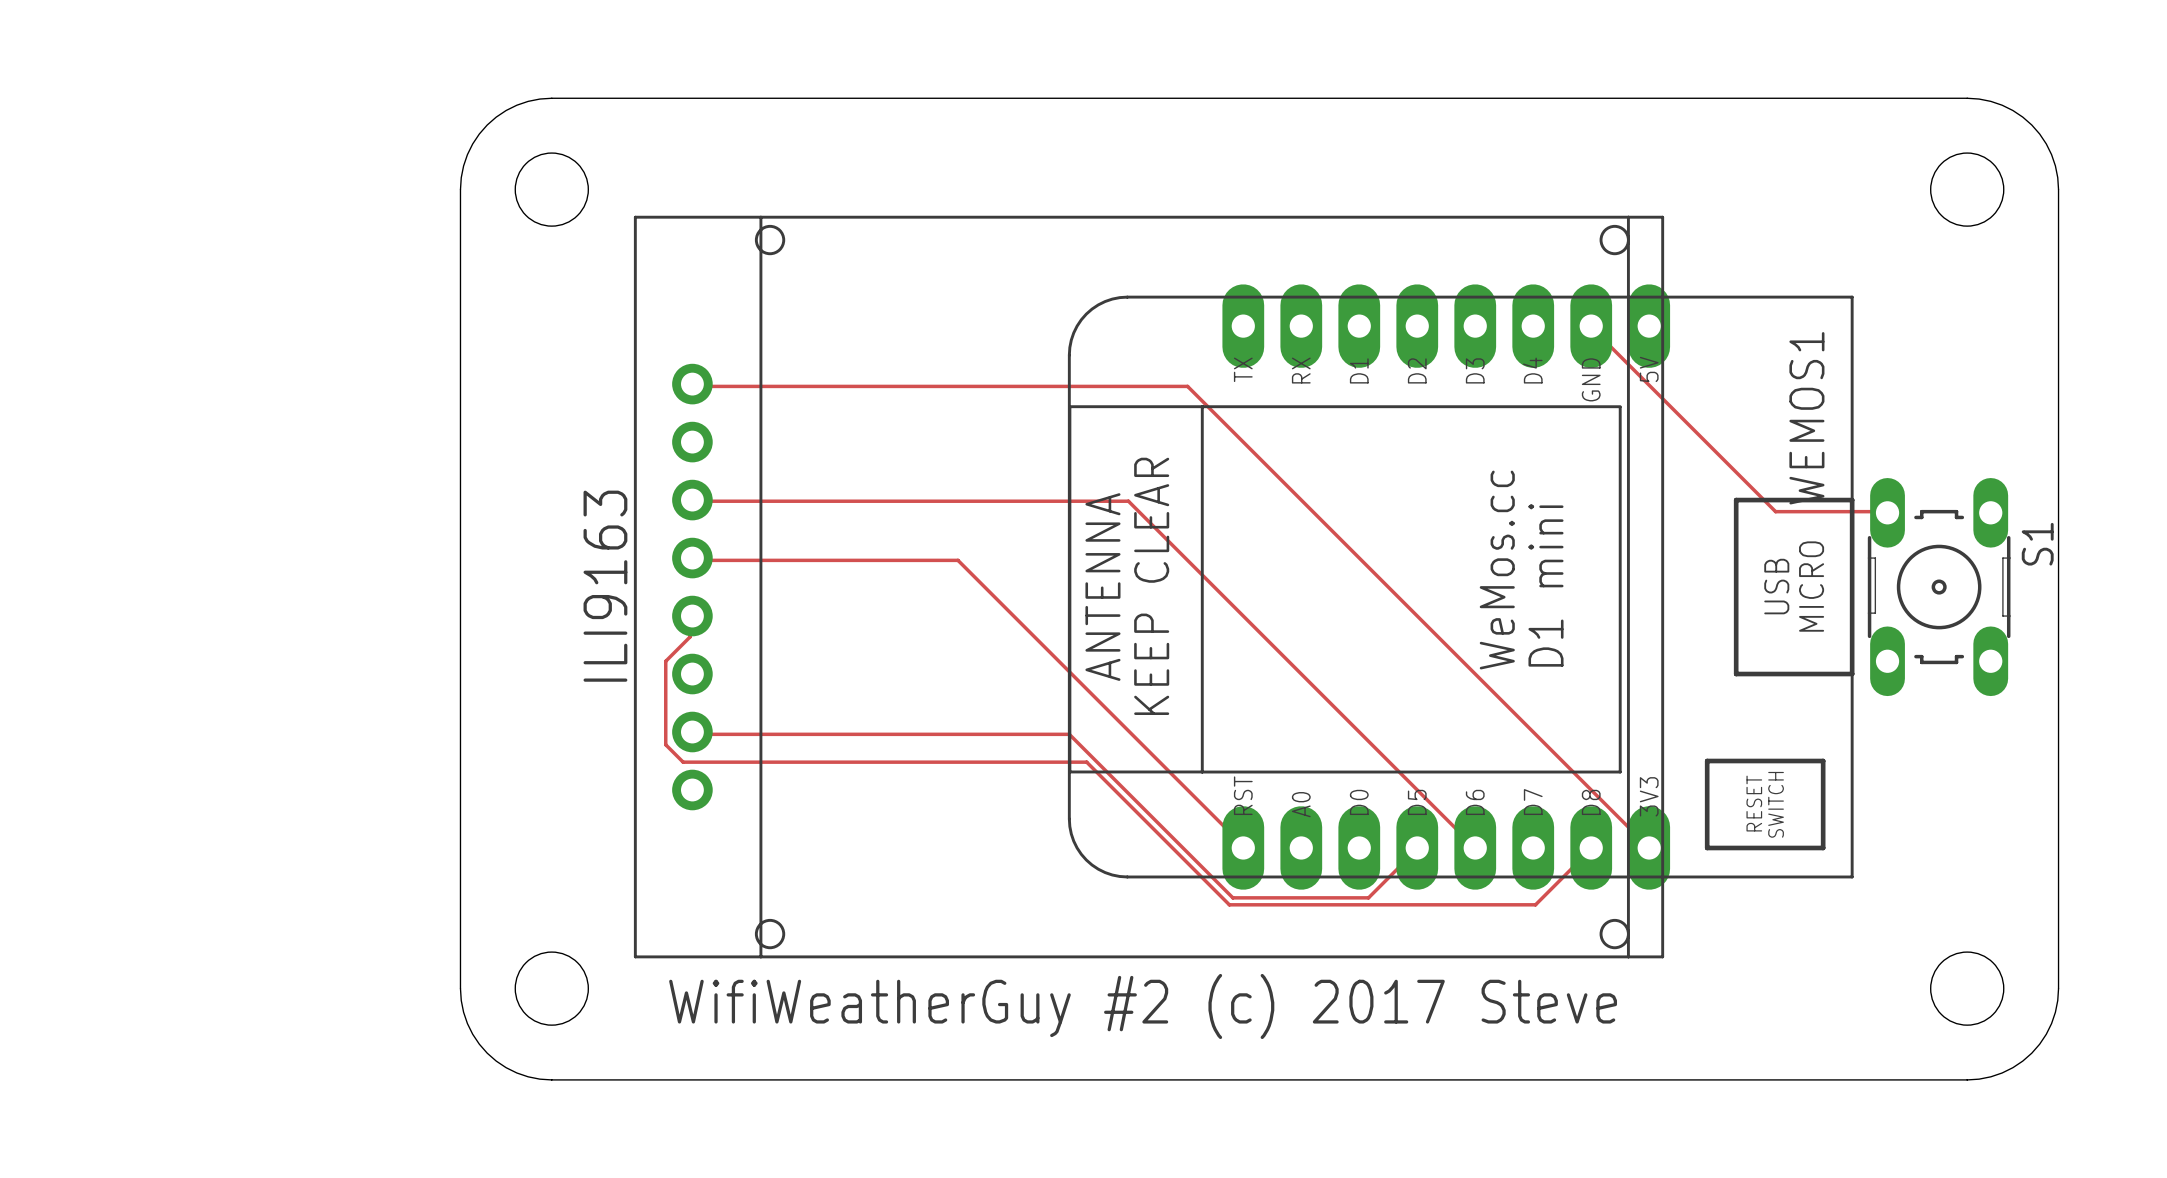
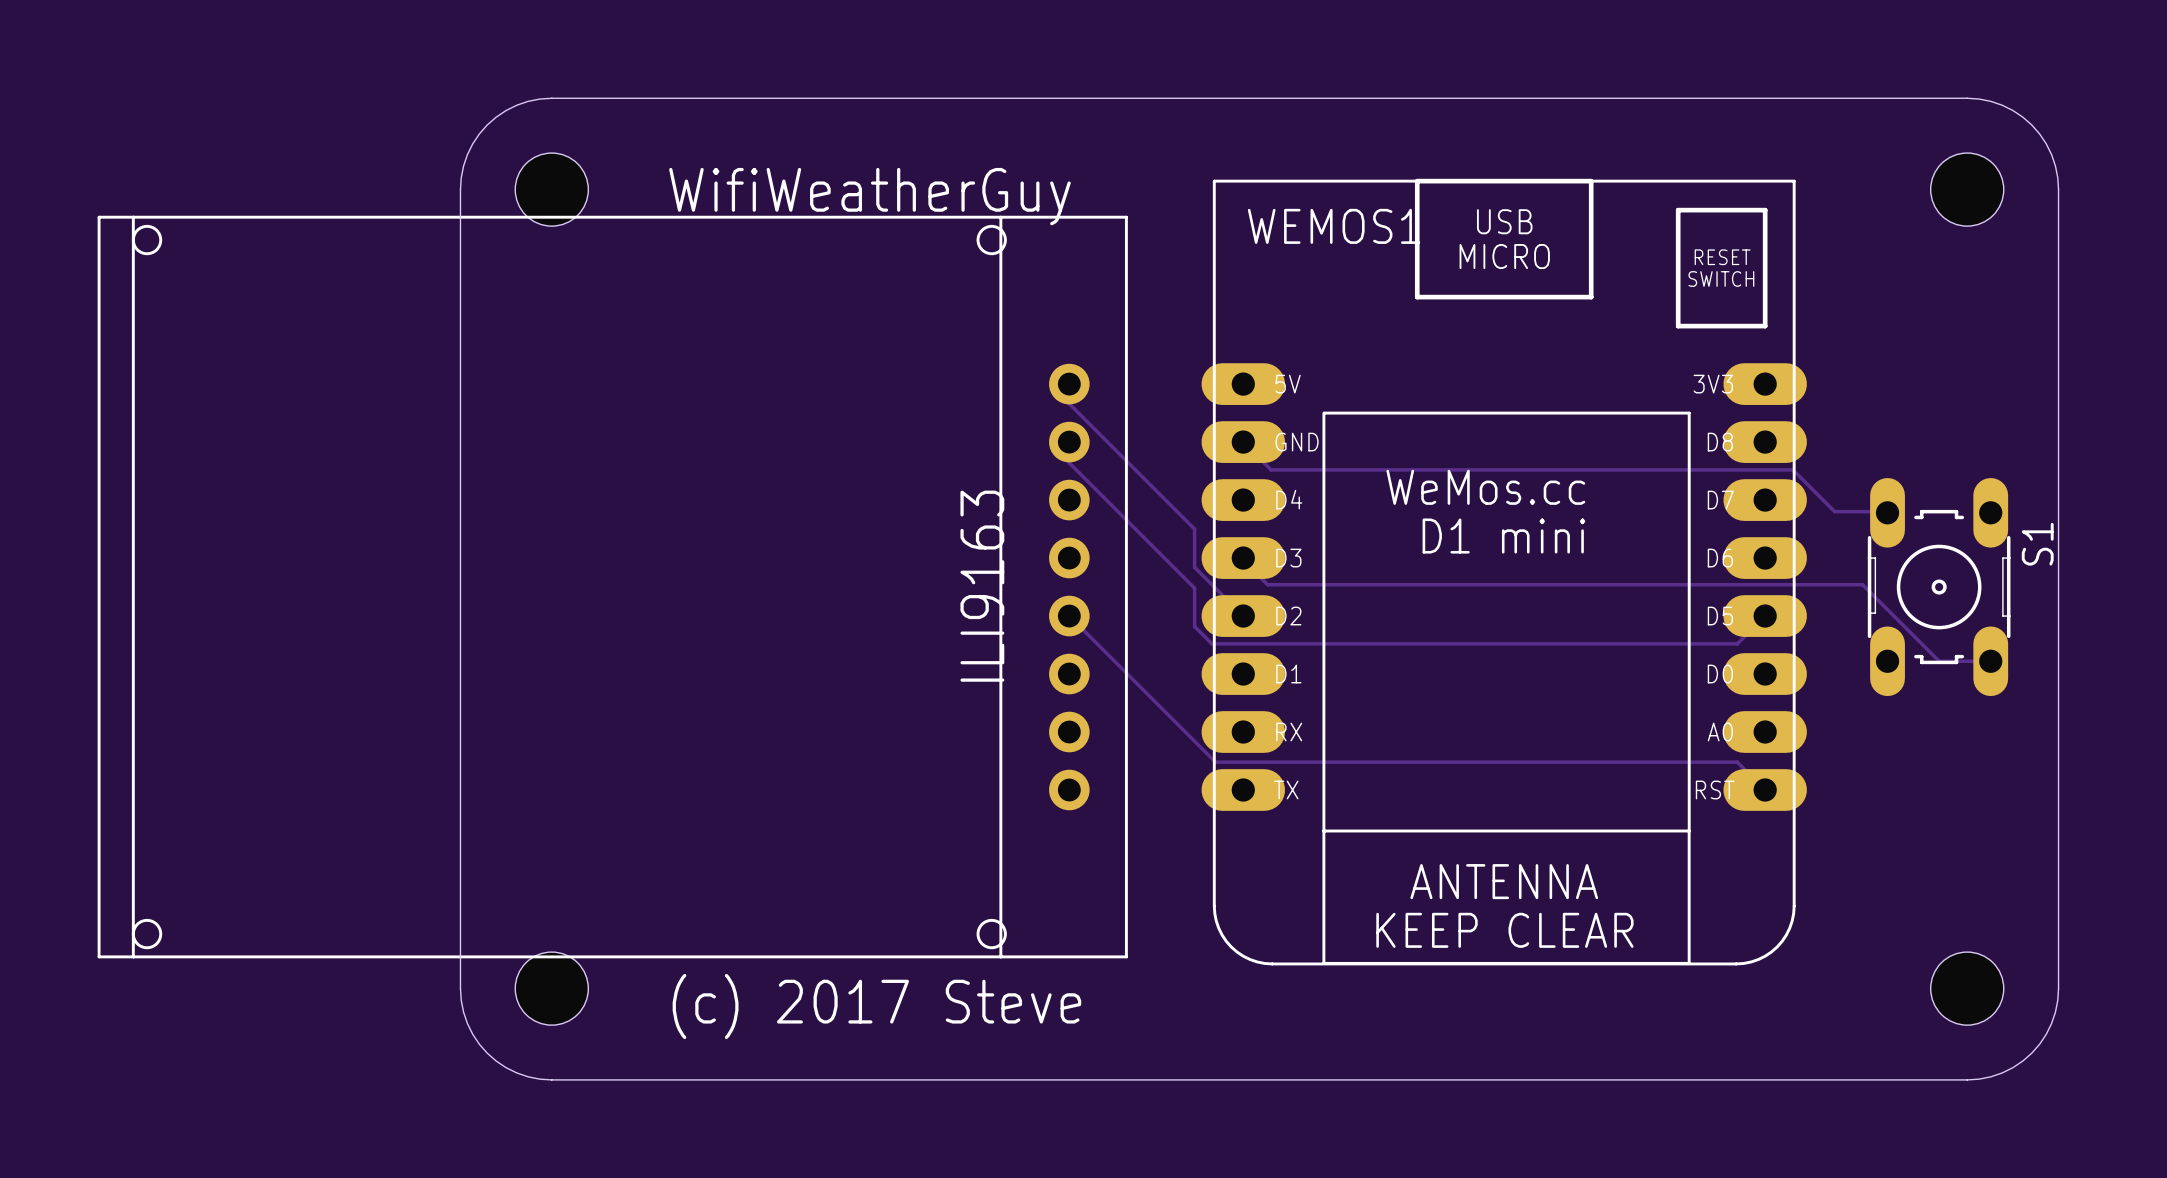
text: none -> WifiWeatherGuy (869, 196)
WEMOS1 footprint: [1067, 284, 1855, 890] -> [1201, 178, 1807, 966]
track: (1591, 326) (1775, 511) (1834, 511) -> (1271, 469) (1793, 469) (1834, 511)
track: (692, 384) (693, 386) (1187, 386) (1243, 442) -> none
WEMOS1 name position: WEMOS1 (1806, 418) -> WEMOS1 (1334, 226)
track: none -> (1069, 442) (1069, 462) (1194, 588) (1194, 626) (1211, 643) (1737, 643) (1765, 616)
track: (1271, 469) (1649, 847) -> none
track: (692, 500) (1128, 501) (1194, 567) -> (1069, 384) (1069, 403) (1194, 529) (1194, 567)
track: (692, 558) (693, 560) (958, 560) (1243, 845) (1243, 847) -> none
track: none -> (1243, 558) (1243, 560) (1267, 584) (1862, 584) (1939, 661) (1990, 661)
text position: ILI9163 (605, 586) -> ILI9163 (982, 586)
part rotation: 0° (1149, 587) -> 180° (612, 587)
track: (692, 616) (690, 616) (690, 636) (665, 661) (665, 744) (683, 762) (1086, 762) (1229, 904) (1535, 904) (1591, 847) -> none
track: none -> (1069, 616) (1215, 762) (1737, 762) (1765, 790)
track: (1243, 616) (1475, 847) -> none
track: (692, 732) (693, 734) (1069, 734) (1232, 897) (1368, 897) (1417, 847) -> none
text: WifiWeatherGuy #2 (c) 2017 Steve (1143, 1006) -> (c) 2017 Steve (876, 1006)

